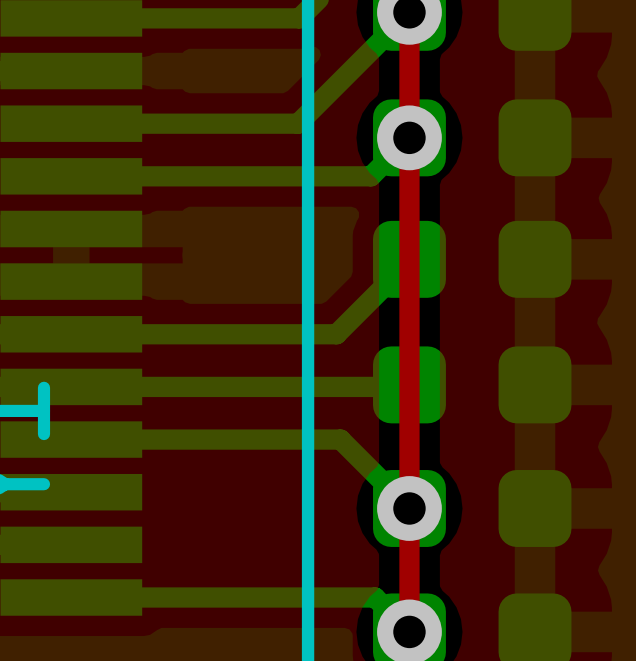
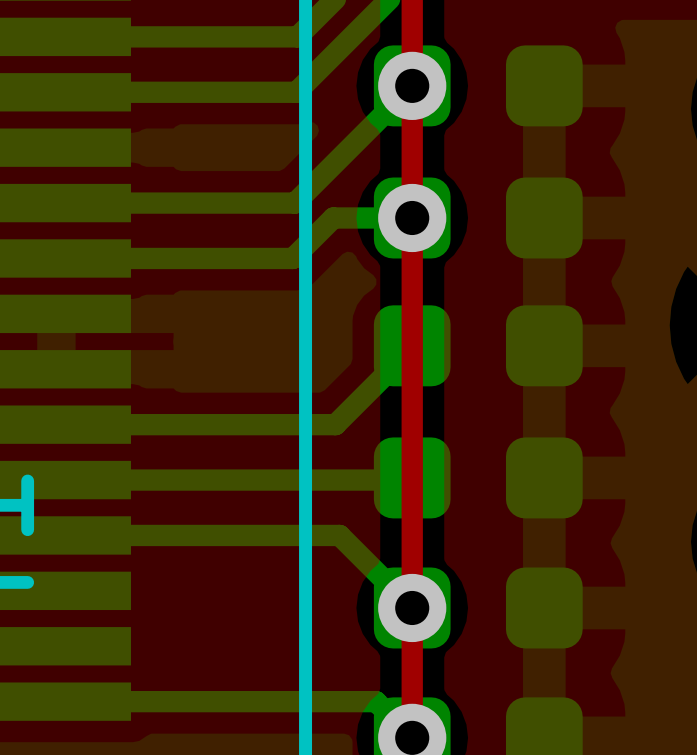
bottom track: (409, 137) (371, 176) (296, 176) -> (388, 217) (333, 217) (292, 258)

